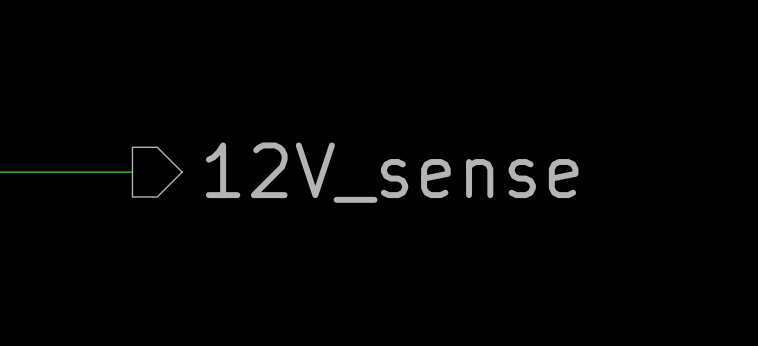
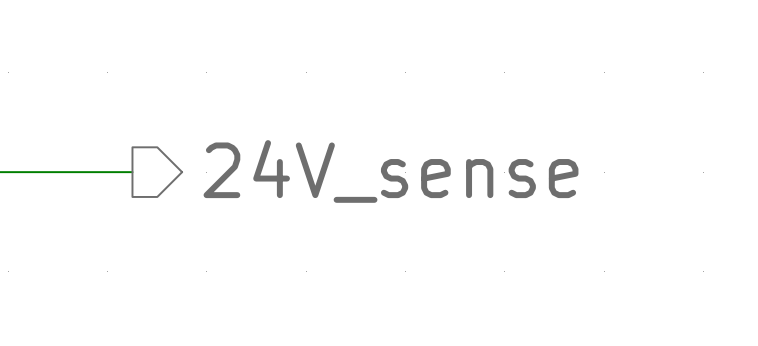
hierarchical label: 12V_sense (392, 172) -> 24V_sense (391, 171)

